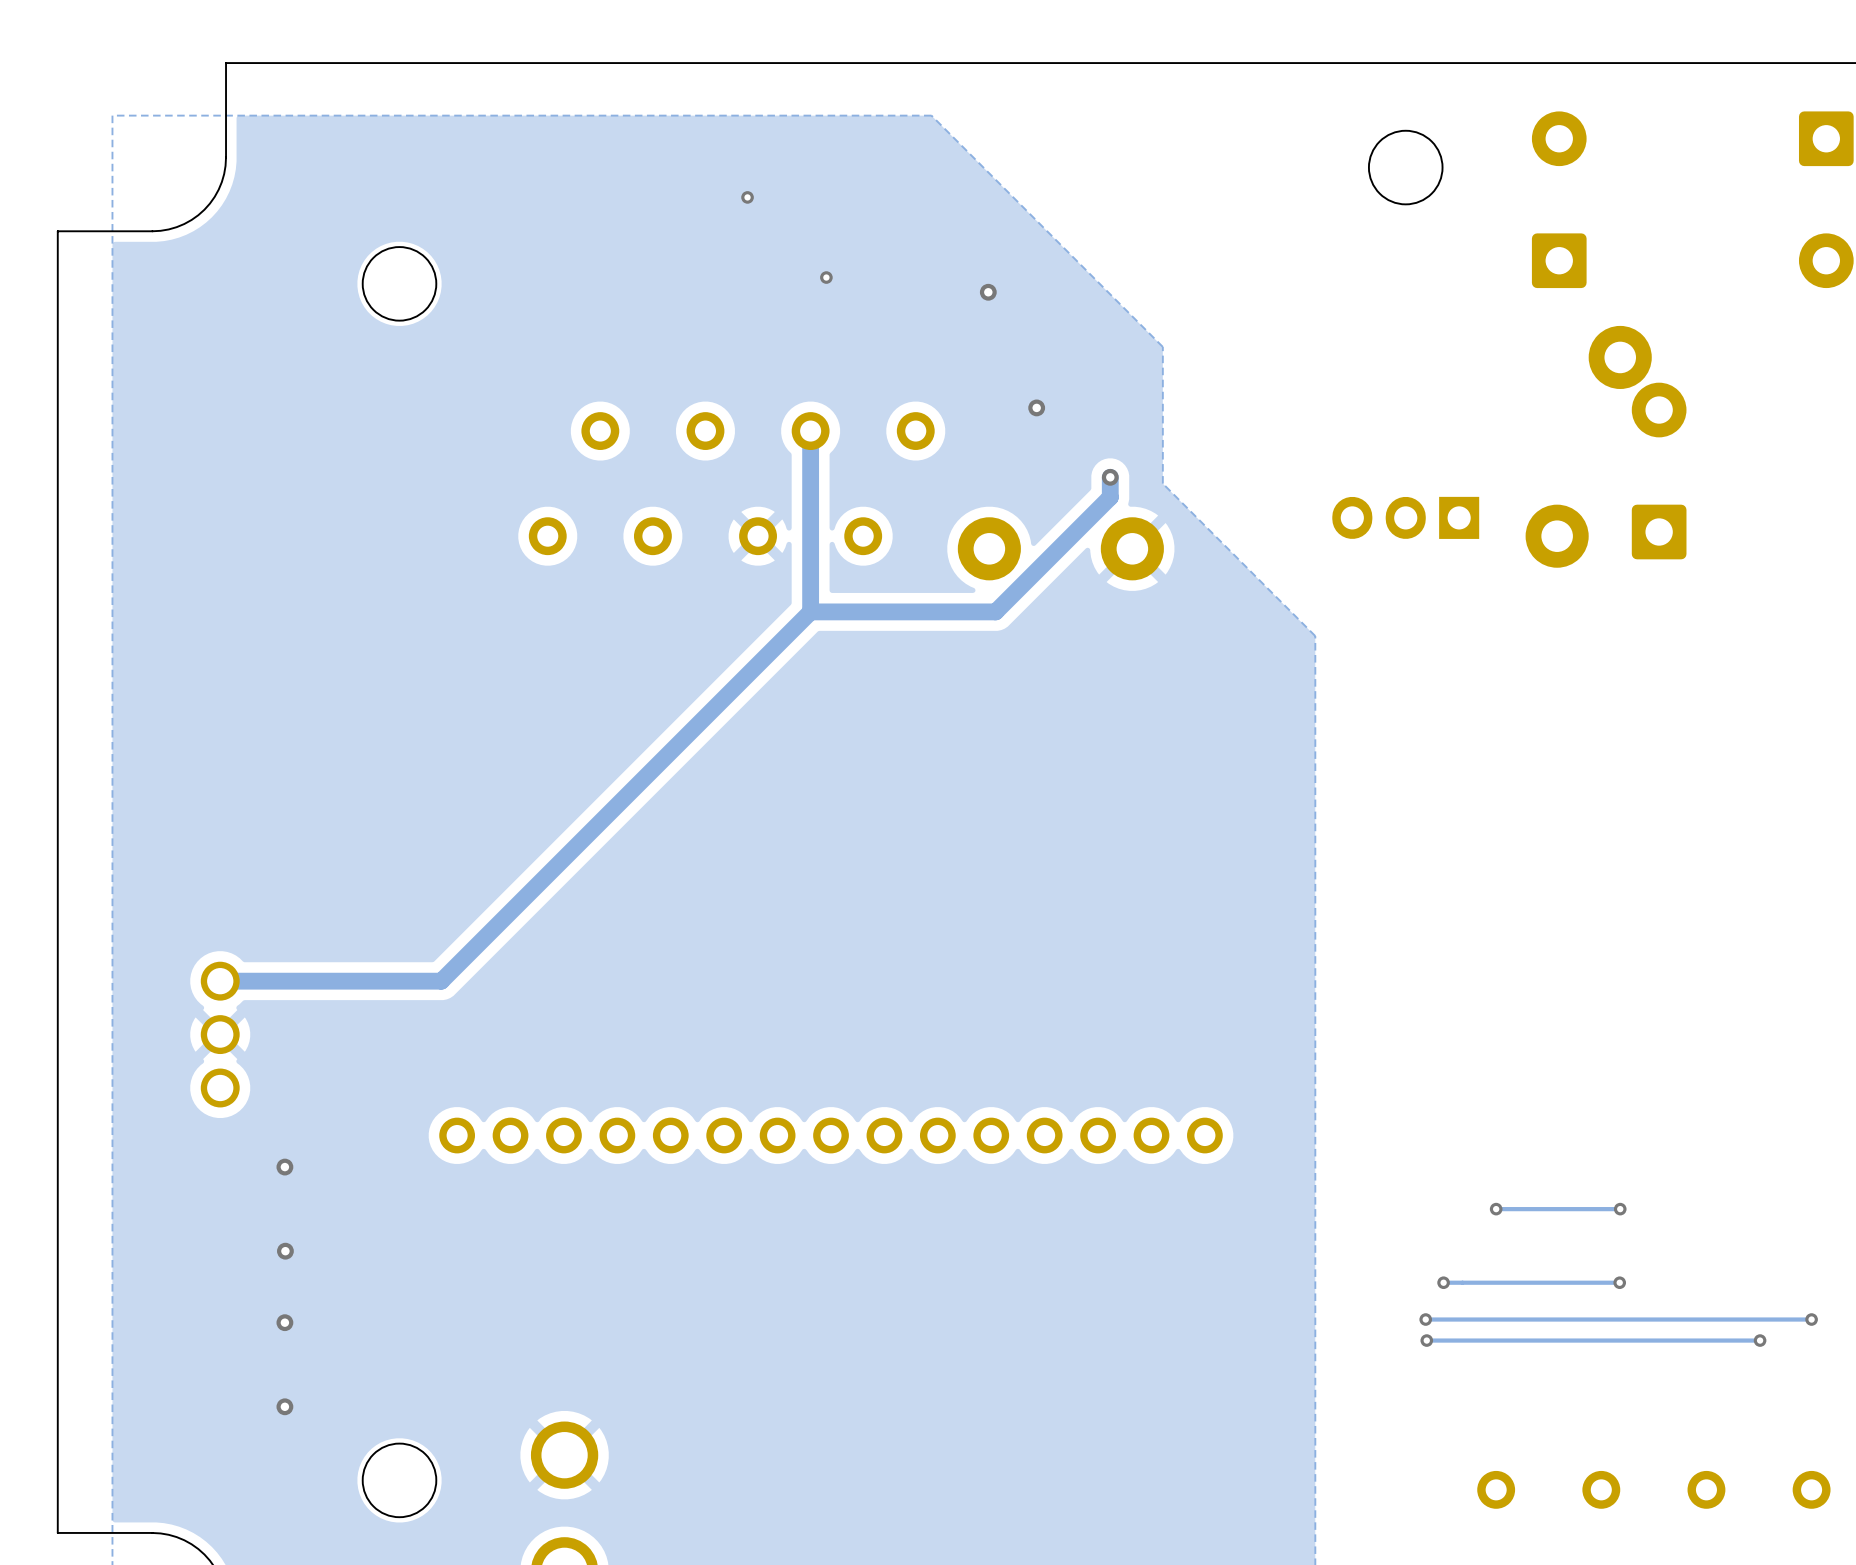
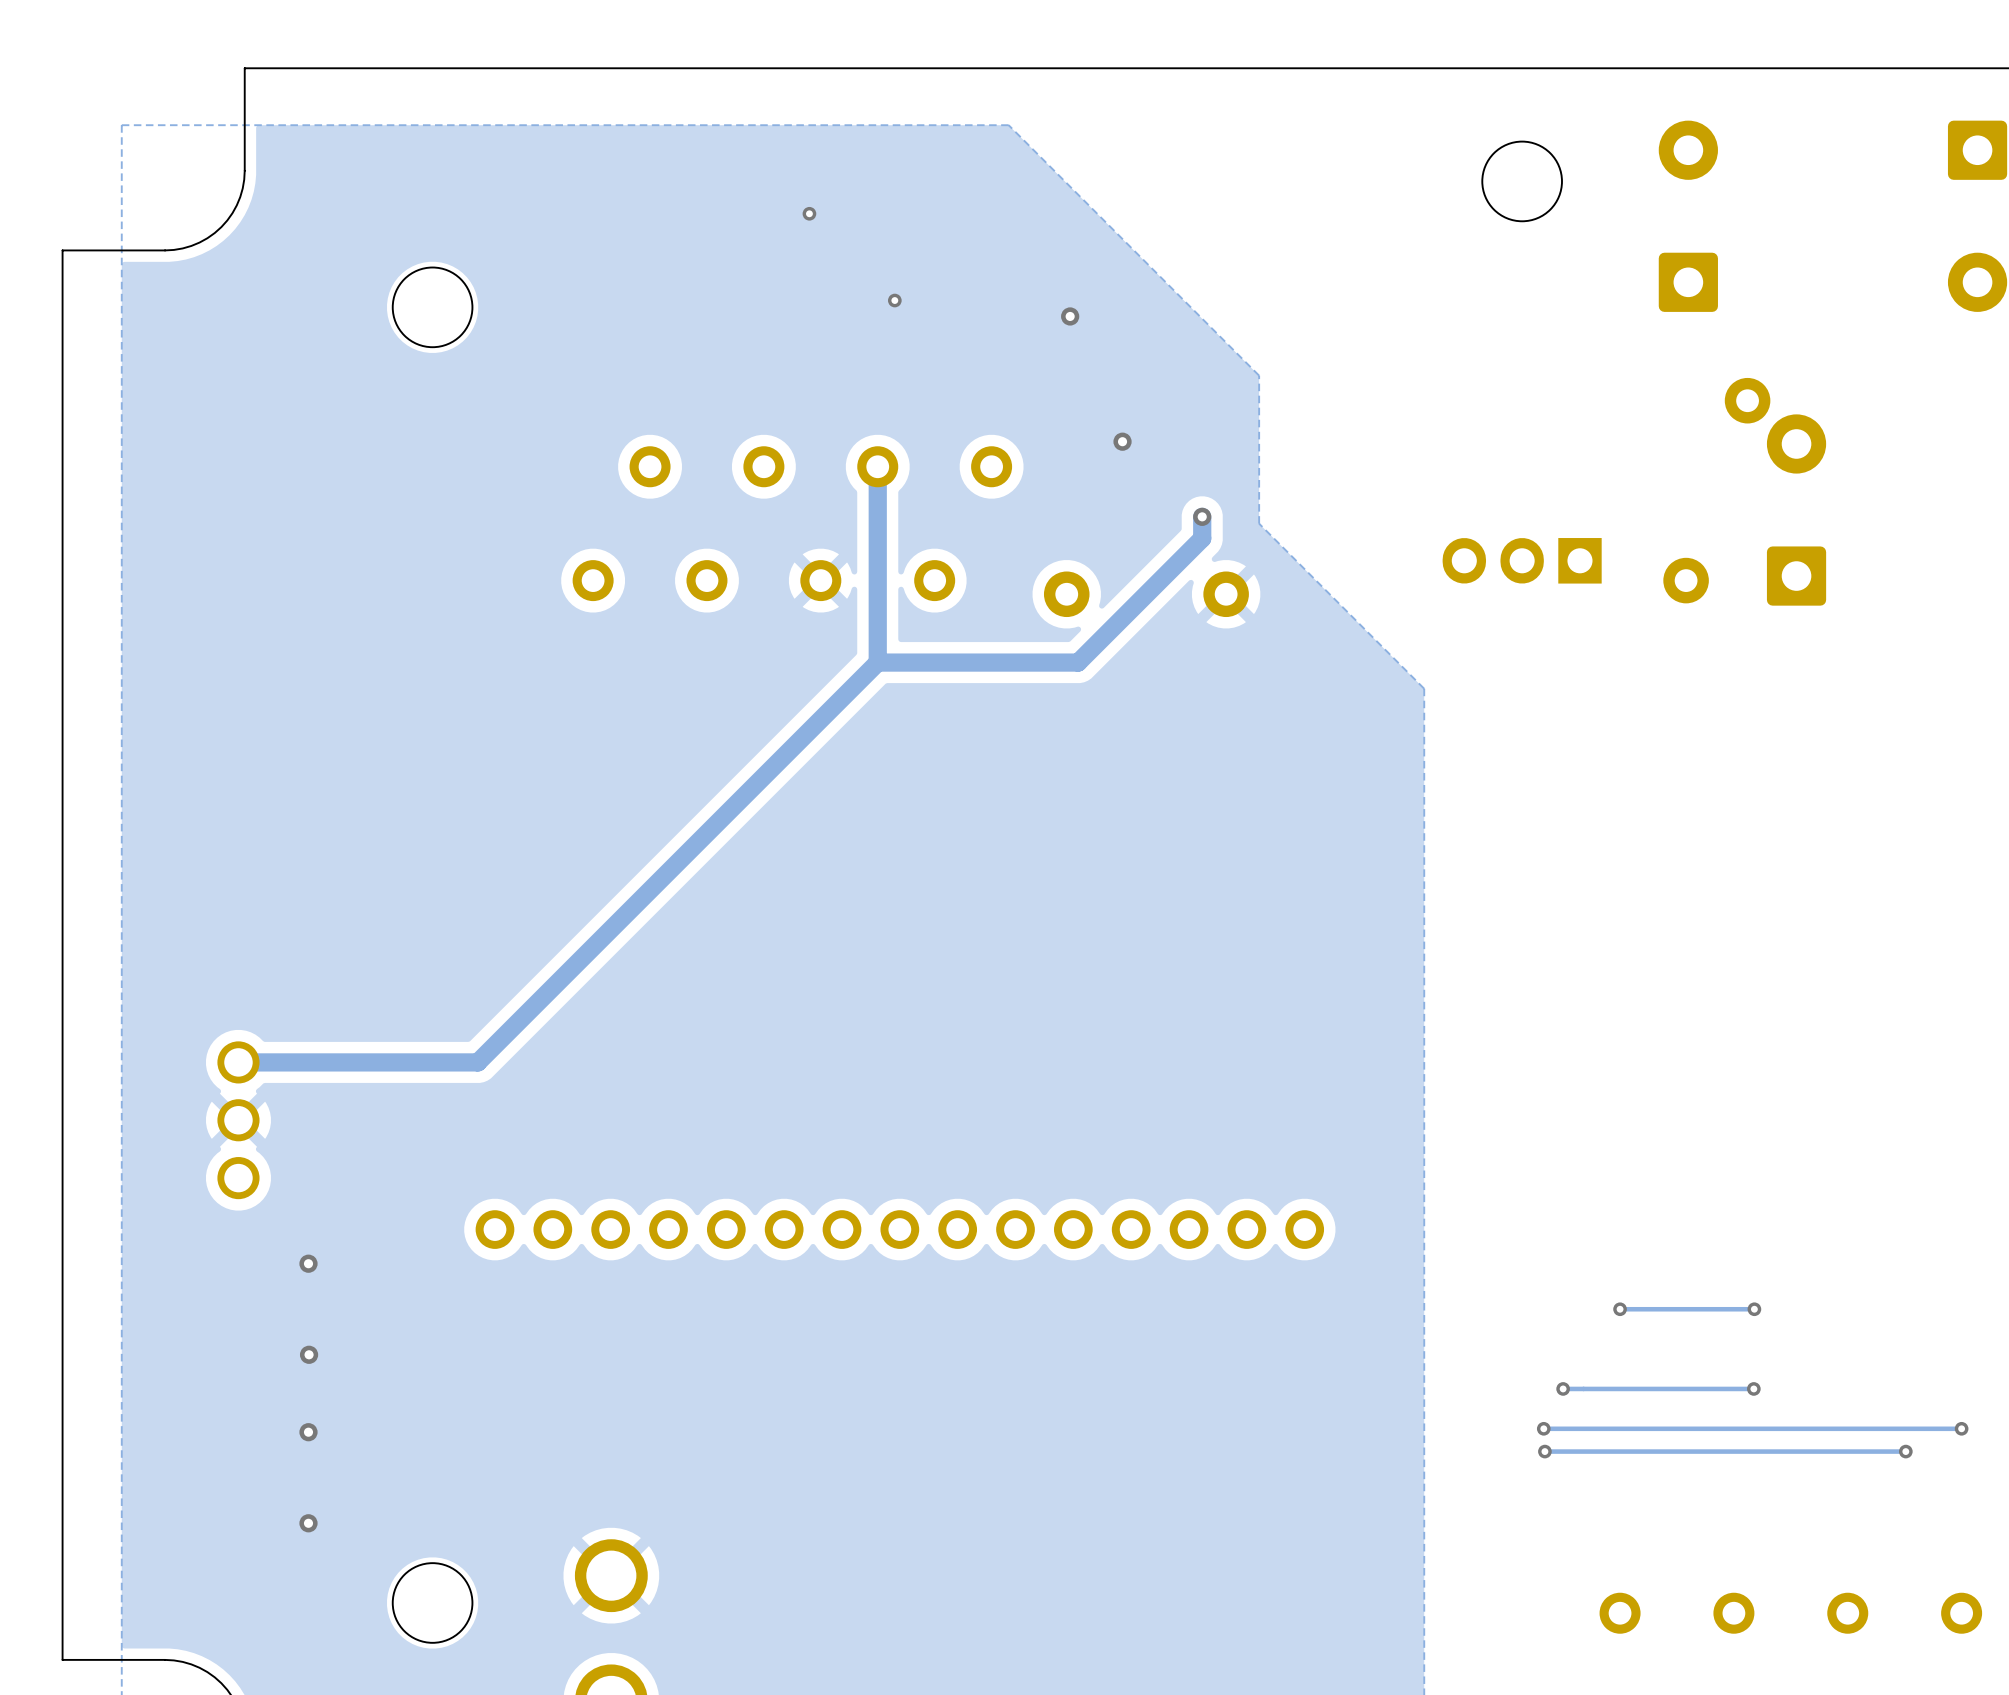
part footprint: [1588, 325, 1652, 389] -> [1724, 377, 1771, 424]
part footprint: [1525, 504, 1589, 568] -> [1663, 557, 1709, 604]
part footprint: [957, 517, 1021, 581] -> [1043, 571, 1090, 618]
part footprint: [1100, 517, 1164, 581] -> [1203, 571, 1249, 618]

